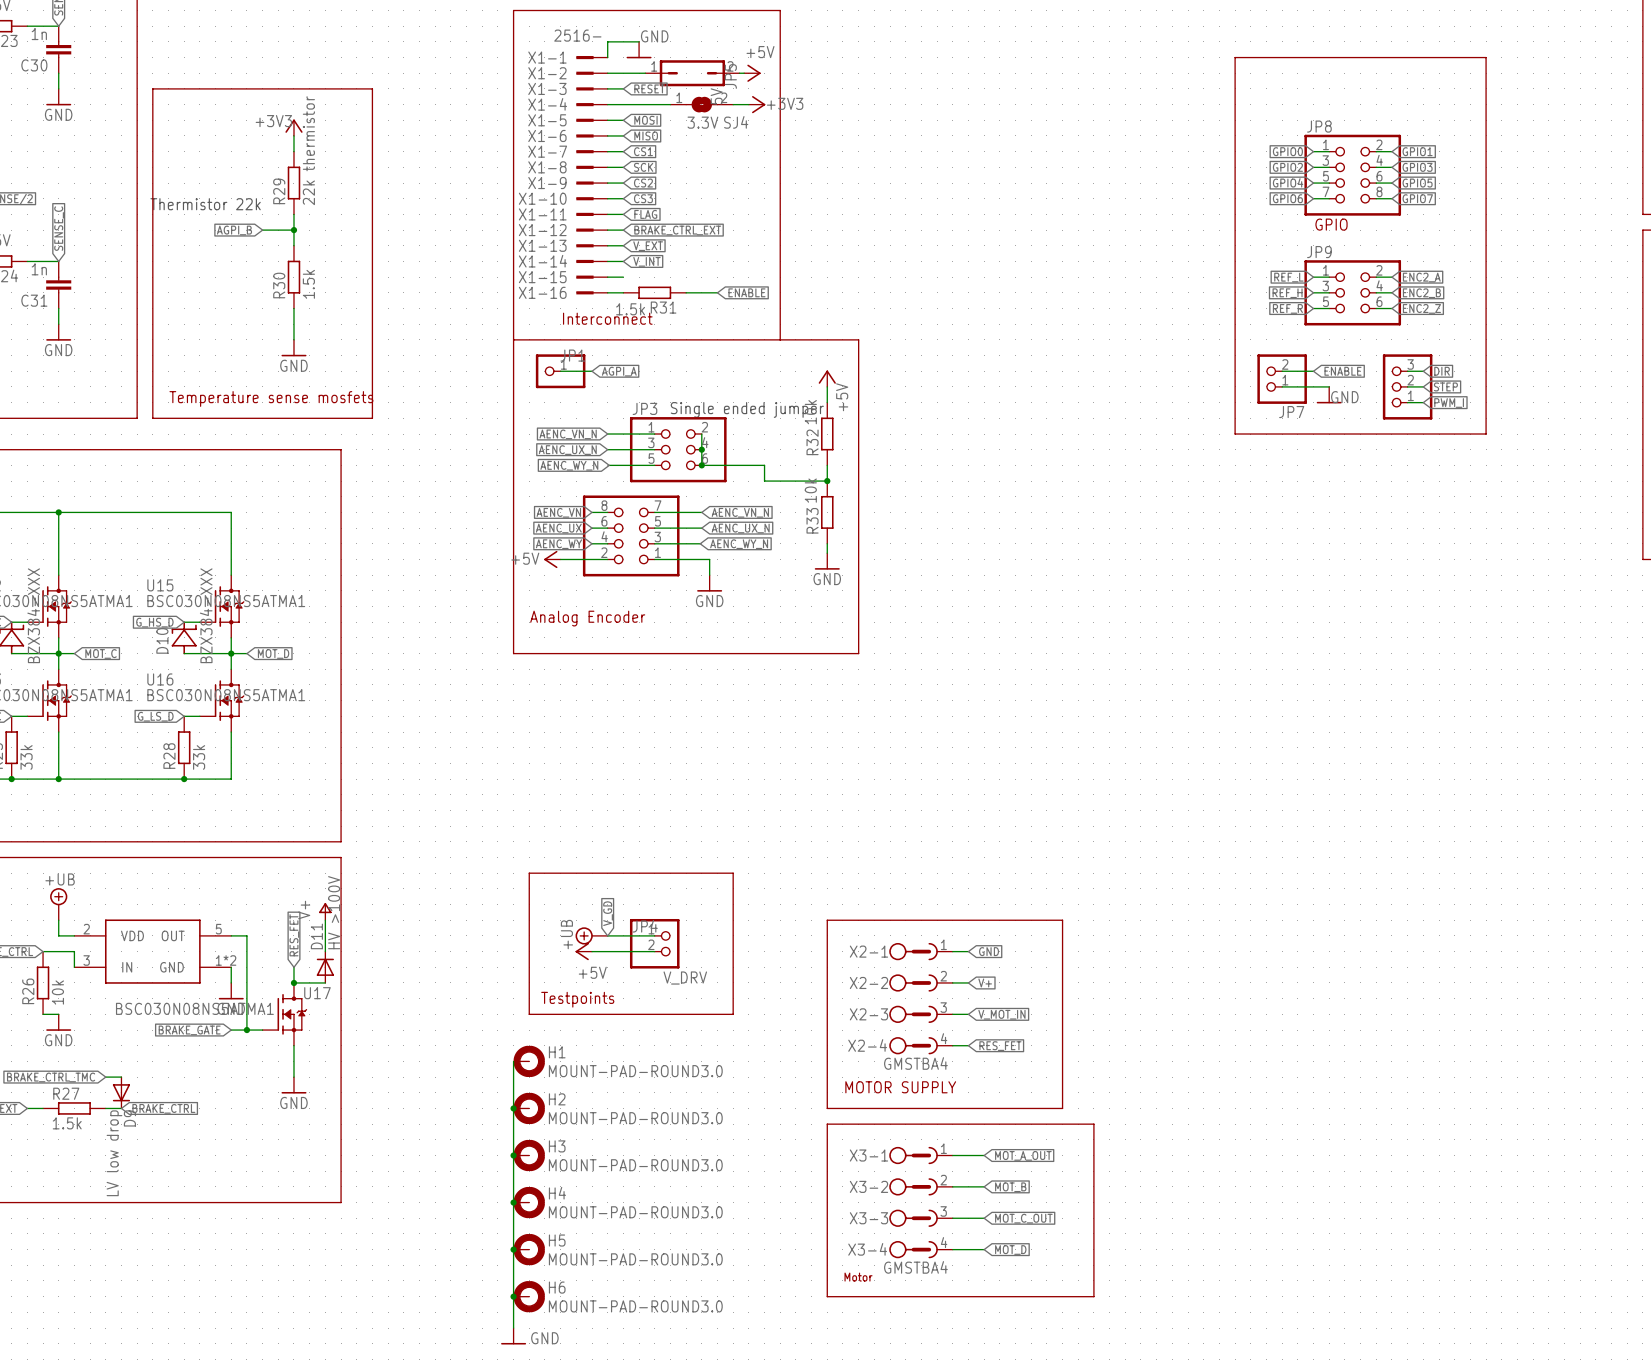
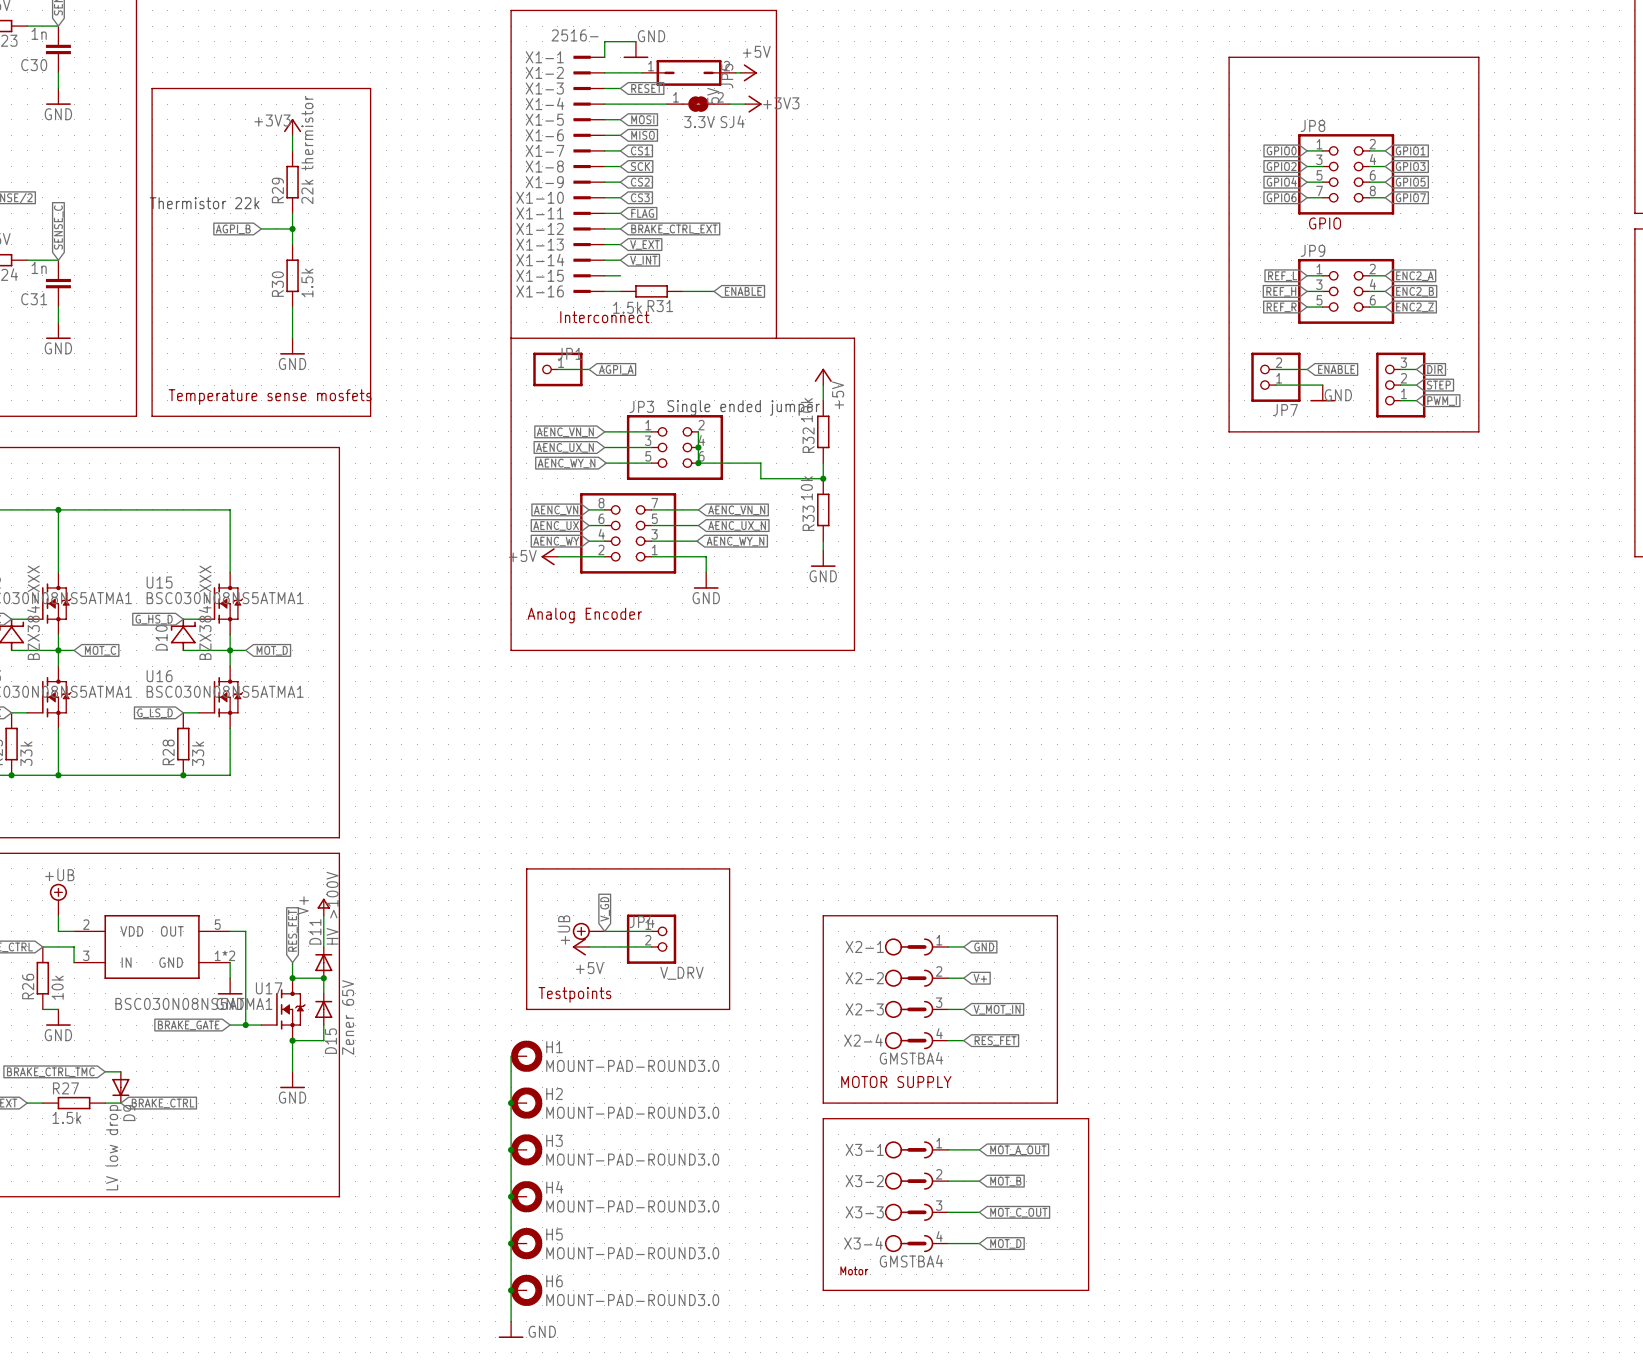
wire: none -> (323, 978) (323, 993)
junction: none -> (323, 978)
U17 name position: U17 (317, 993) -> U17 (269, 988)
D15: none -> Zener 65V (323, 1009)
wire: none -> (323, 1025) (323, 1040) (292, 1040)
junction: none -> (292, 1040)

